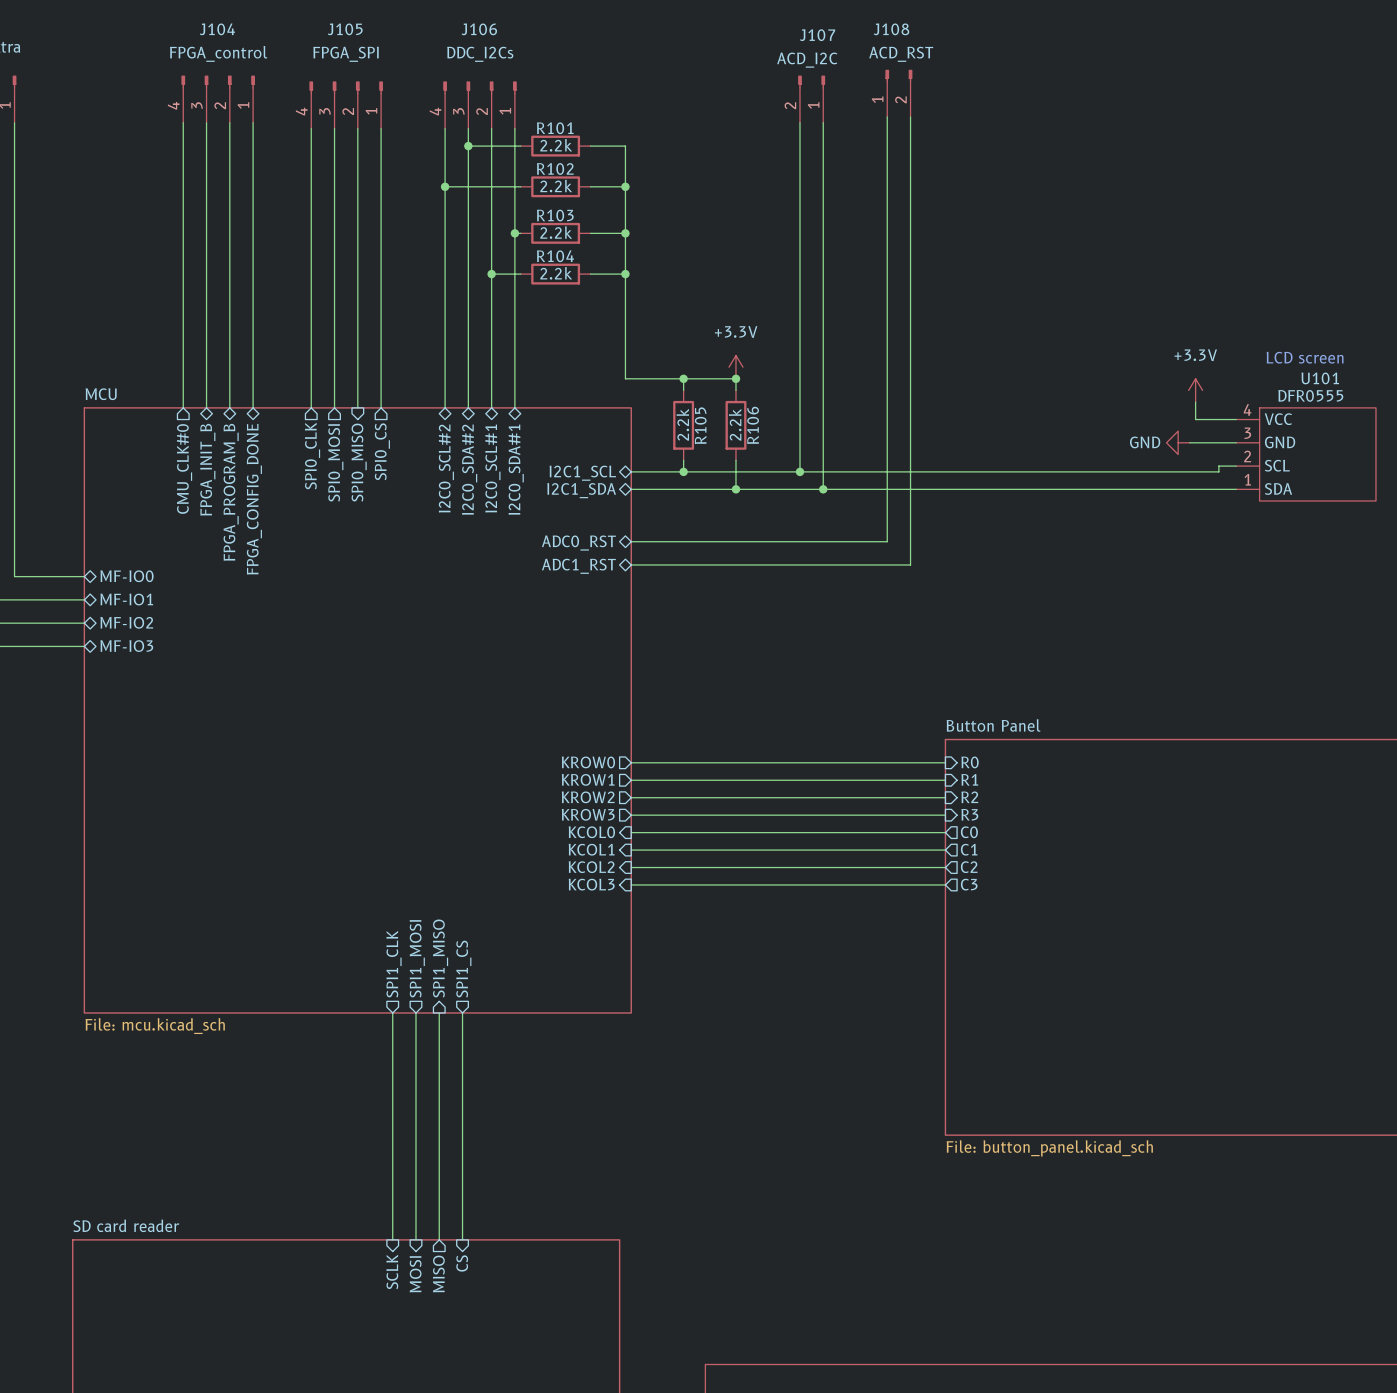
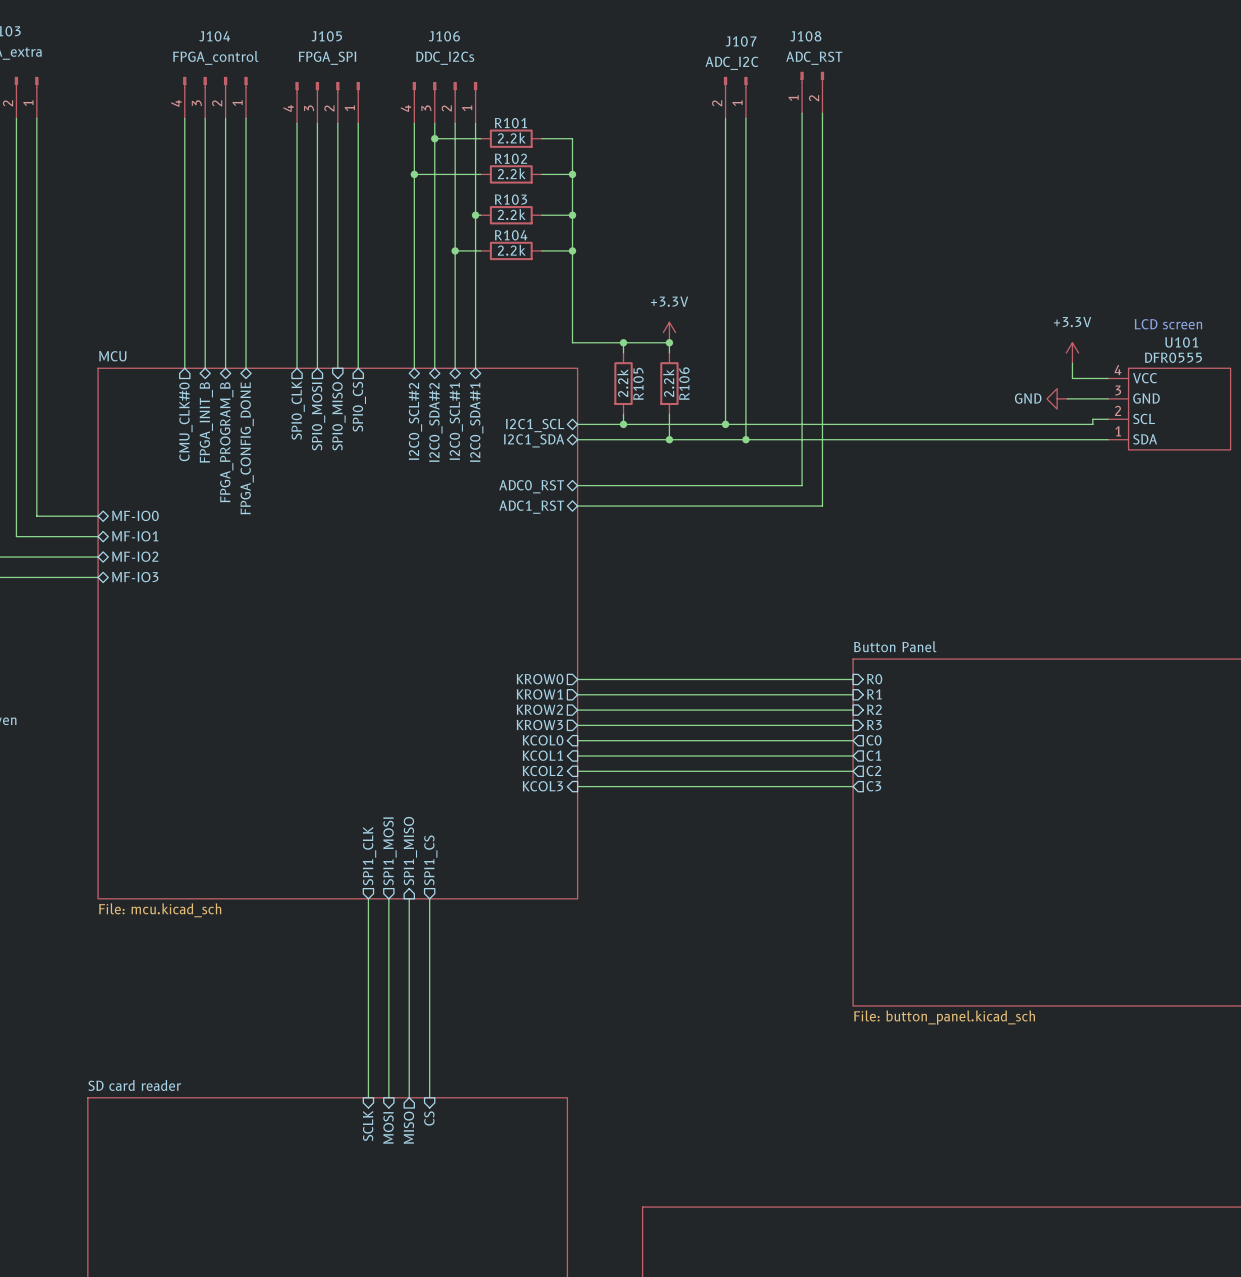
J108 value: ACD_RST (901, 54) -> ADC_RST (814, 58)
J107 value: ACD_I2C (807, 60) -> ADC_I2C (731, 63)

